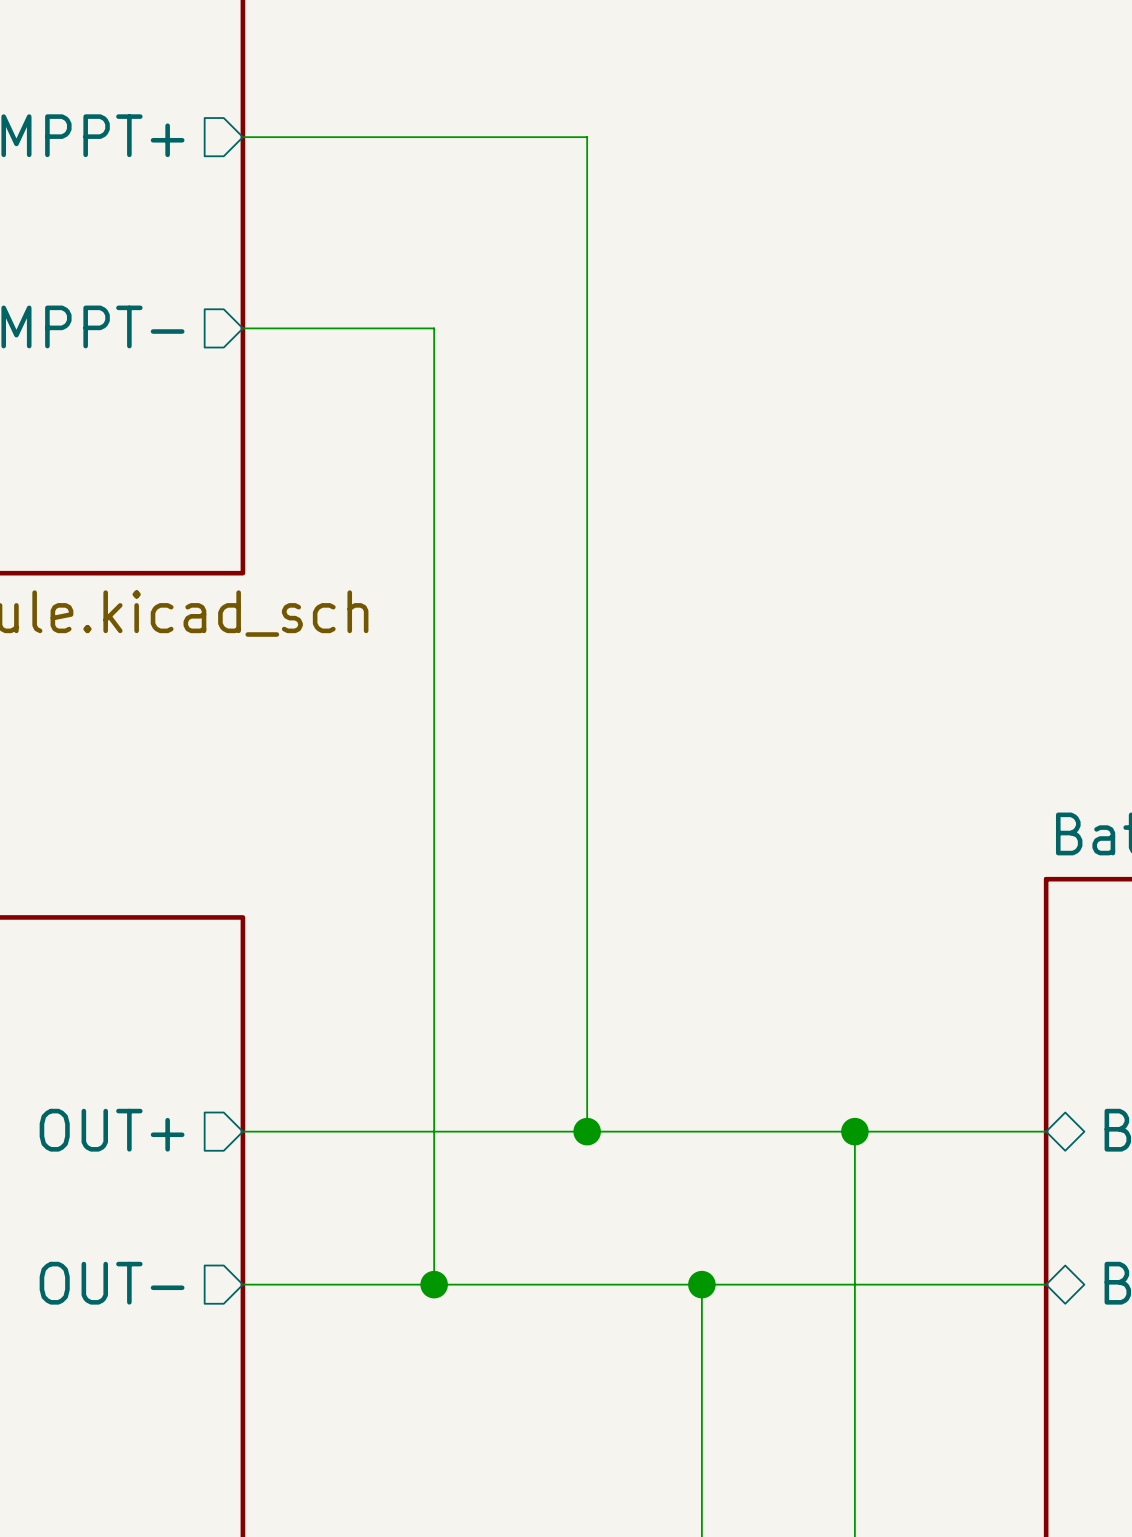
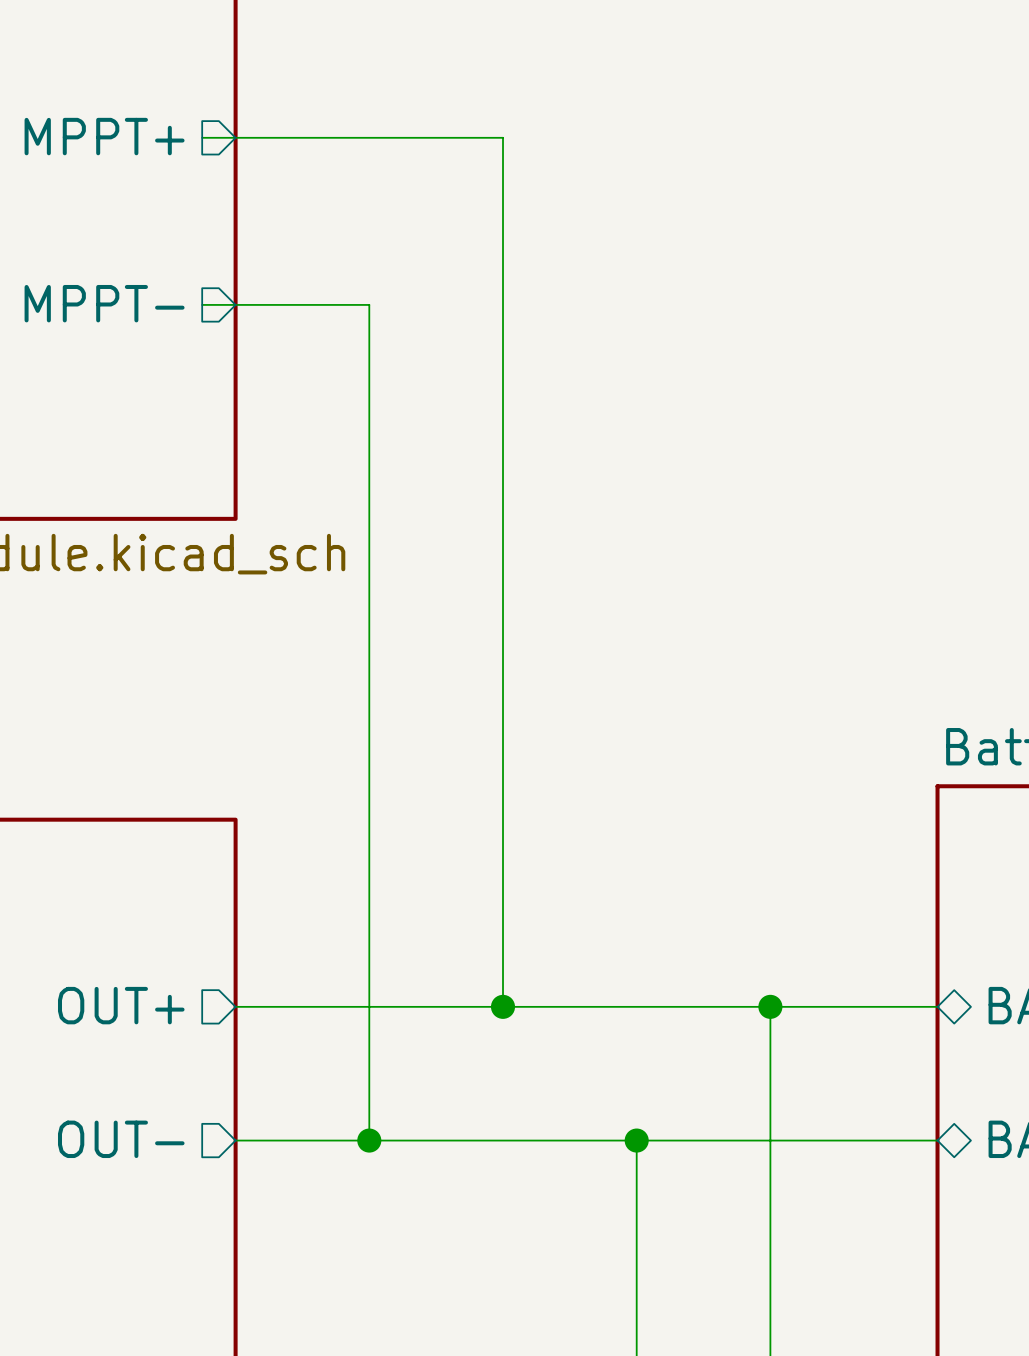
wire: none -> (202, 137) (235, 137)
wire: (548, 137) (587, 137) (587, 1131) -> (503, 137) (503, 1006)
wire: none -> (202, 304) (235, 304)
wire: (395, 328) (434, 328) (434, 1284) -> (369, 304) (369, 1140)
junction position: (587, 1131) -> (503, 1006)
junction position: (434, 1284) -> (369, 1140)

